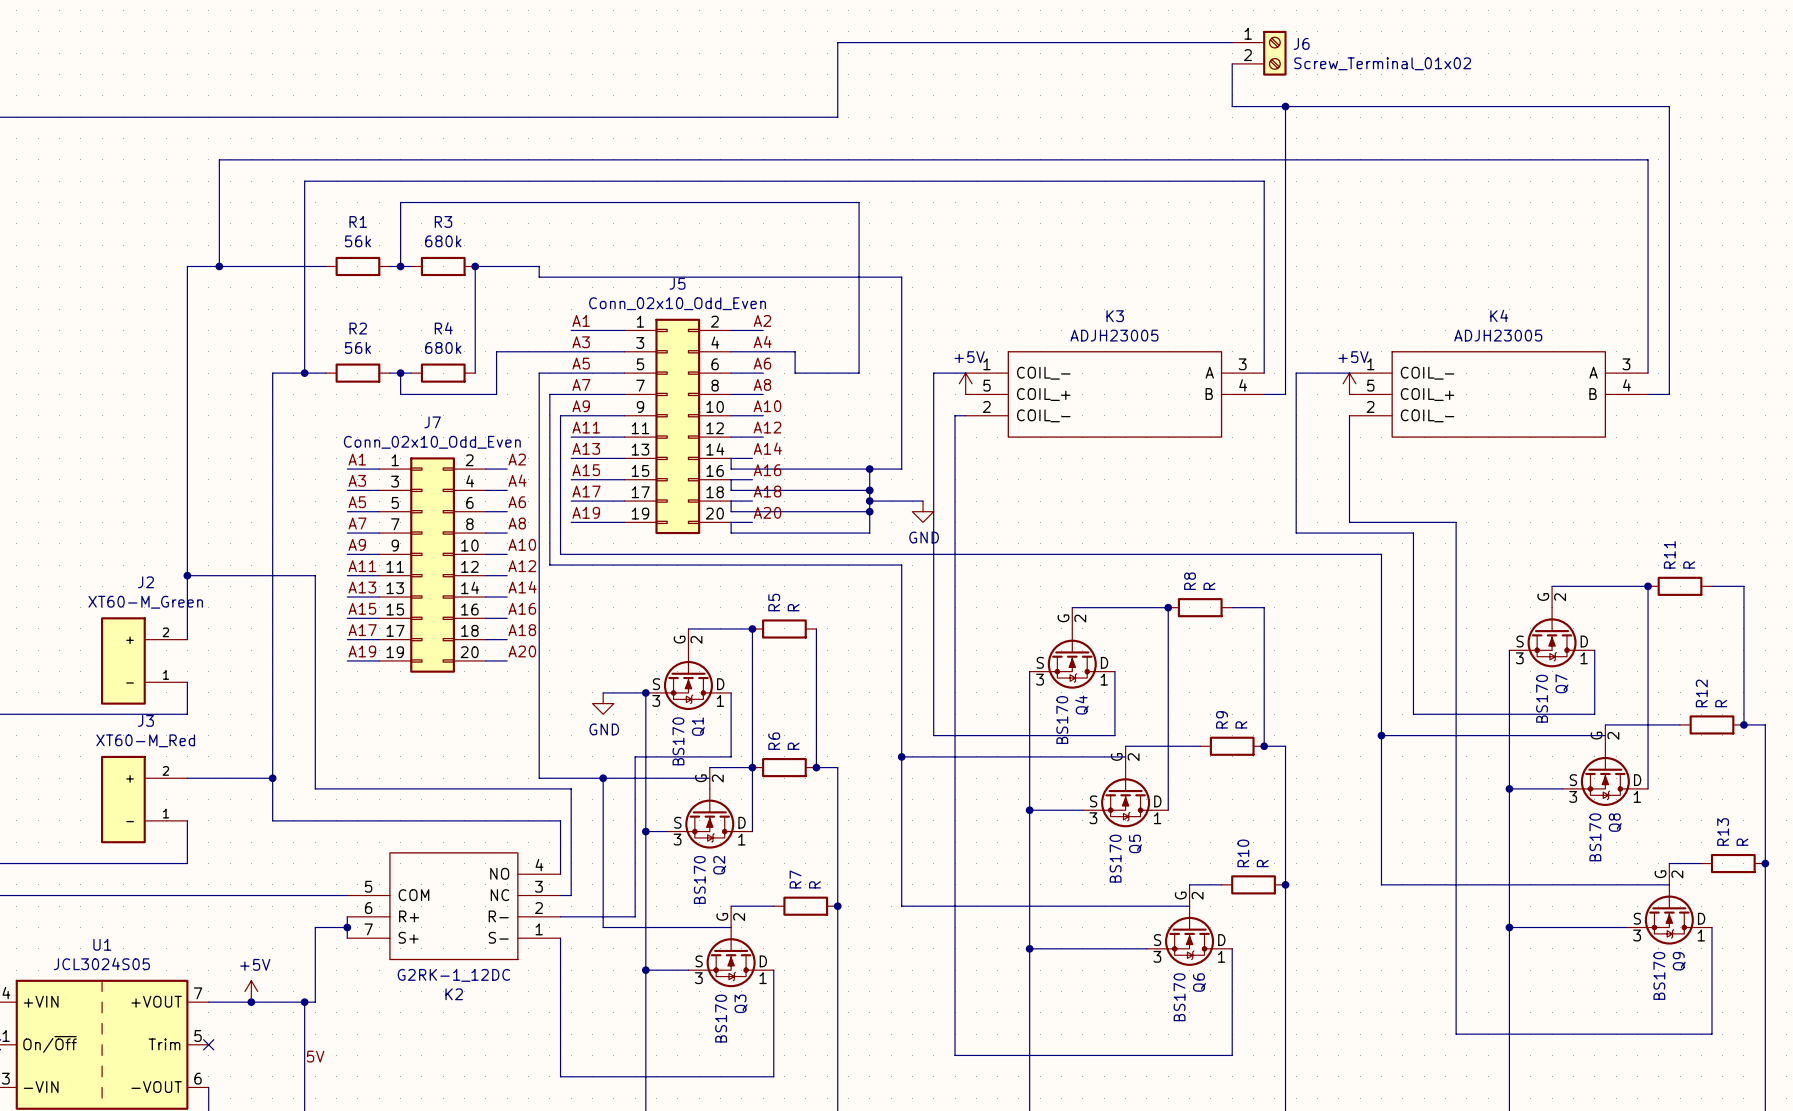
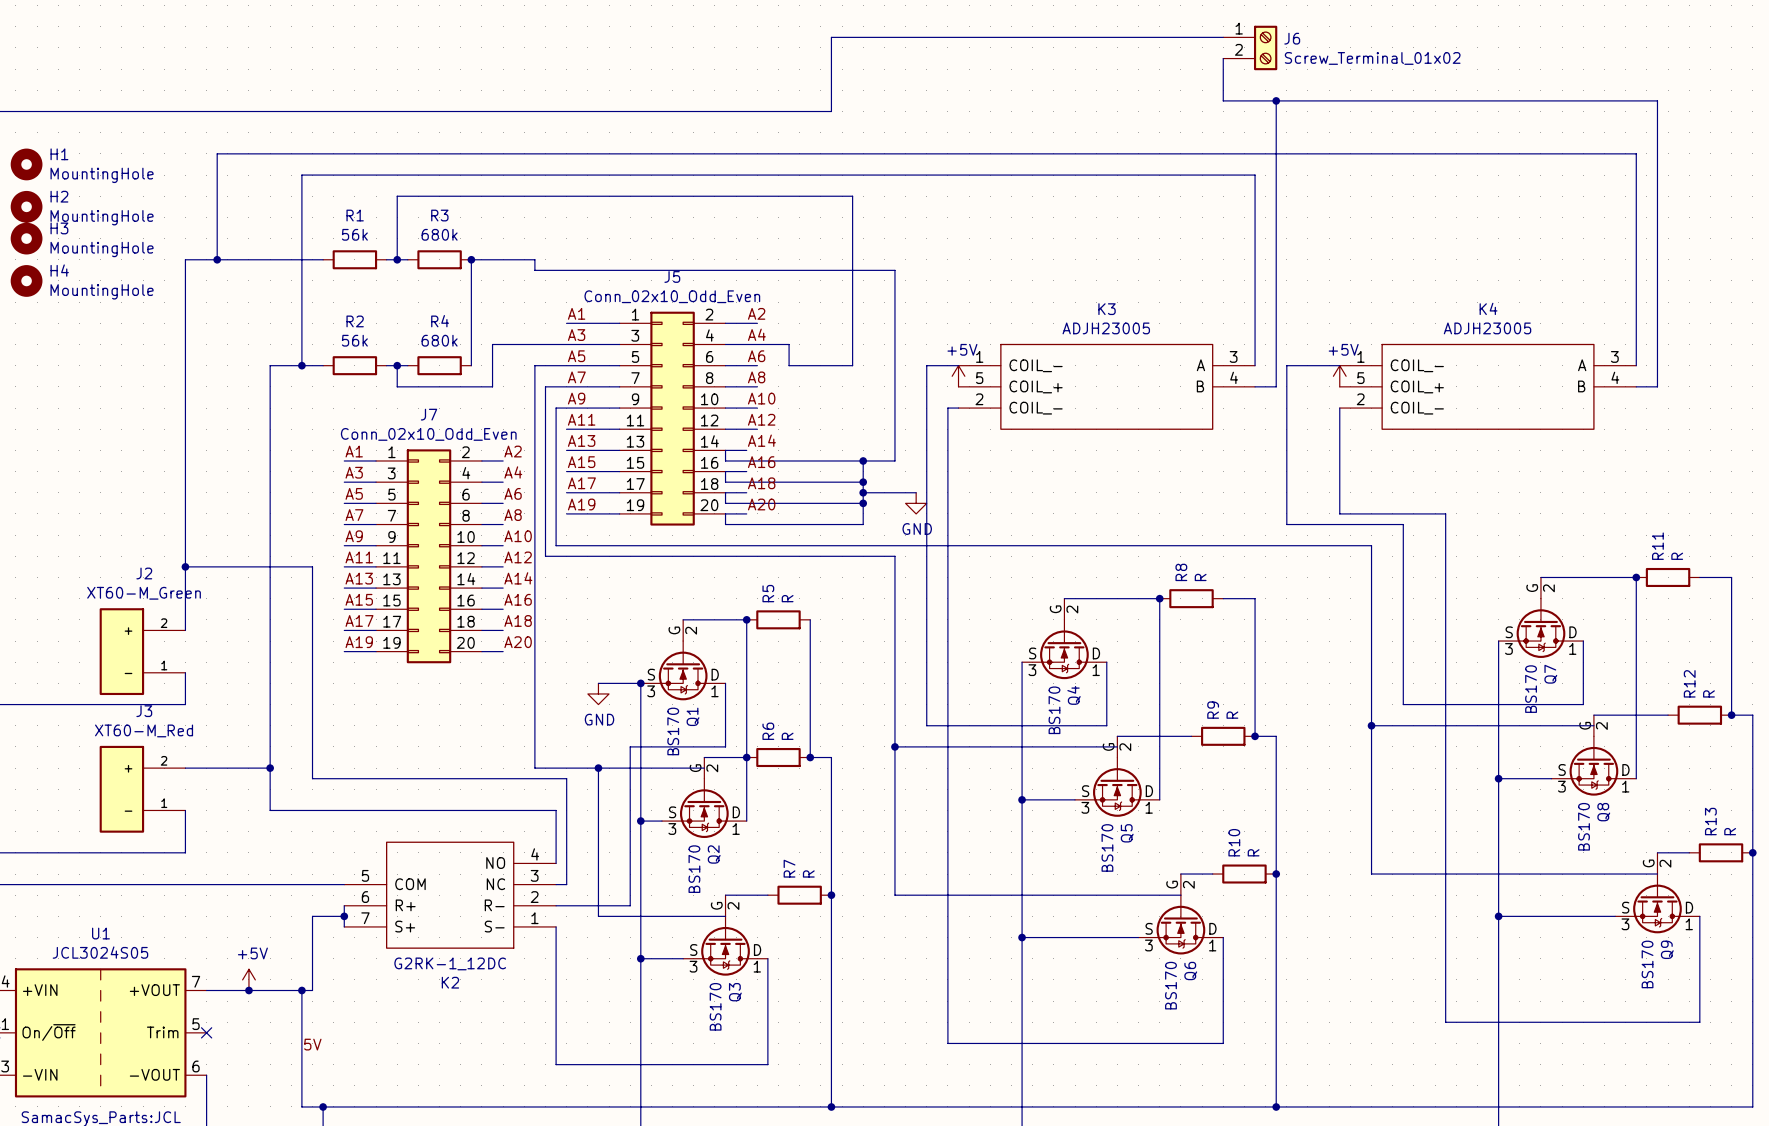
H1: none -> MountingHole (26, 164)
H2: none -> MountingHole (26, 206)
H3: none -> MountingHole (26, 238)
H4: none -> MountingHole (26, 280)

